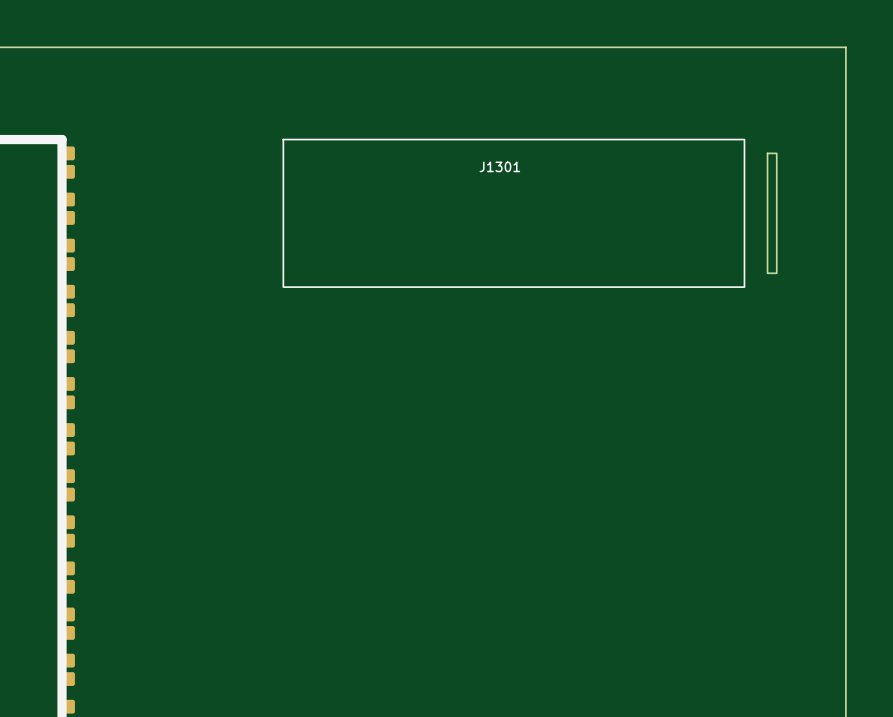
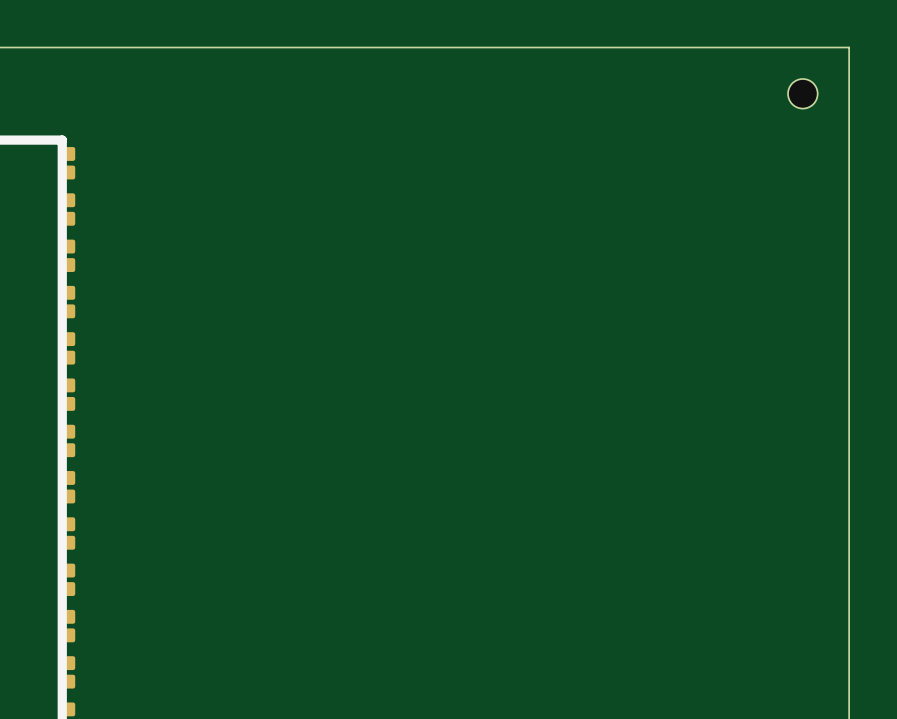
part: none -> (802, 93)
J1301: (529, 213) -> none

